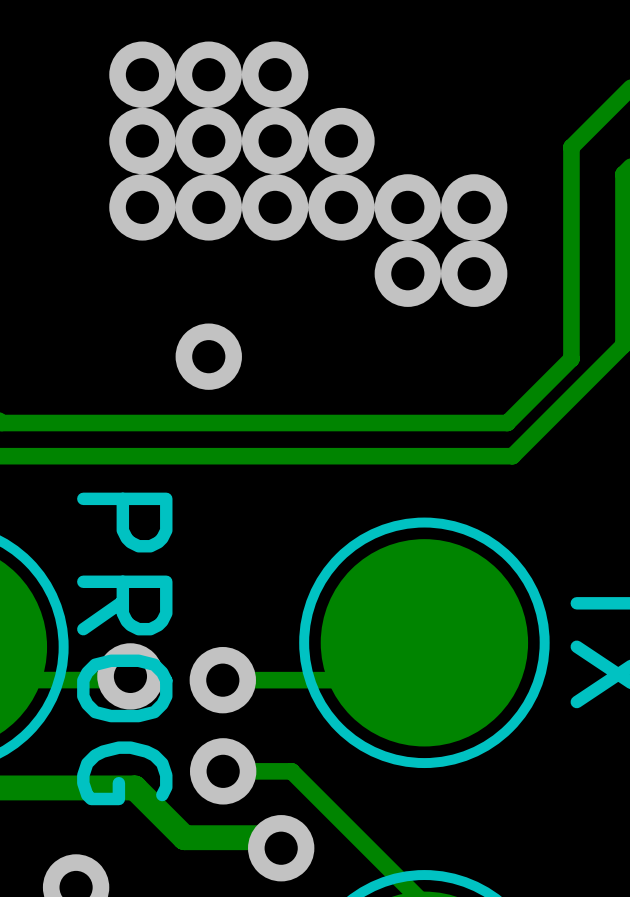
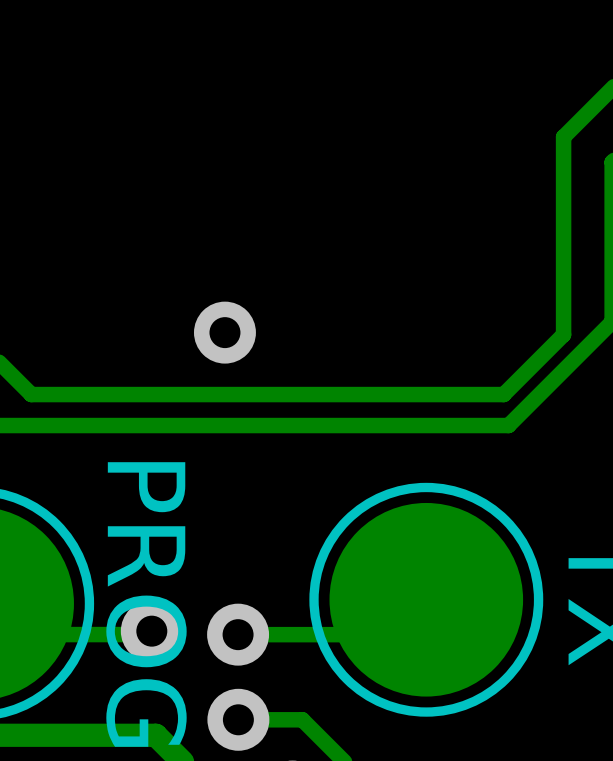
via: (142, 74) -> none
via: (208, 74) -> none
via: (275, 74) -> none
via: (142, 141) -> none
via: (208, 141) -> none
via: (275, 141) -> none
via: (341, 141) -> none
via: (142, 207) -> none
via: (208, 207) -> none
via: (275, 207) -> none
via: (341, 207) -> none
via: (407, 207) -> none
via: (474, 207) -> none
via: (407, 273) -> none
via: (474, 273) -> none

